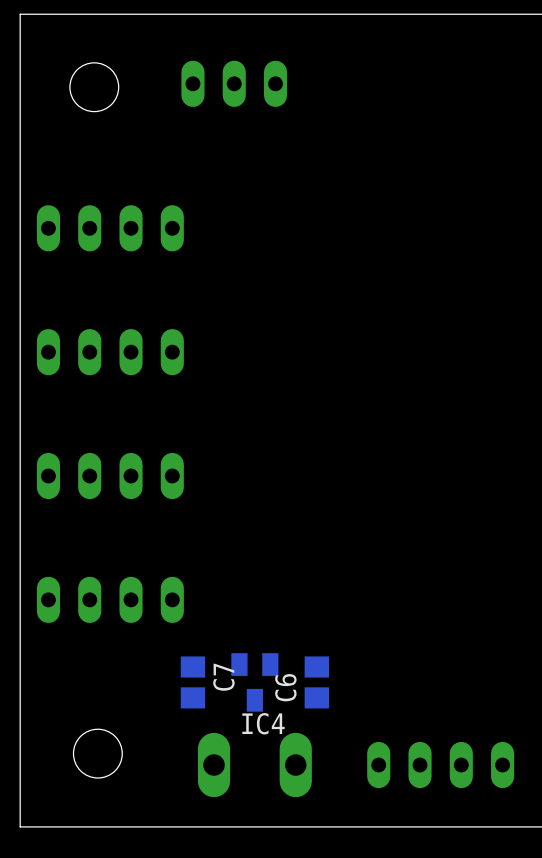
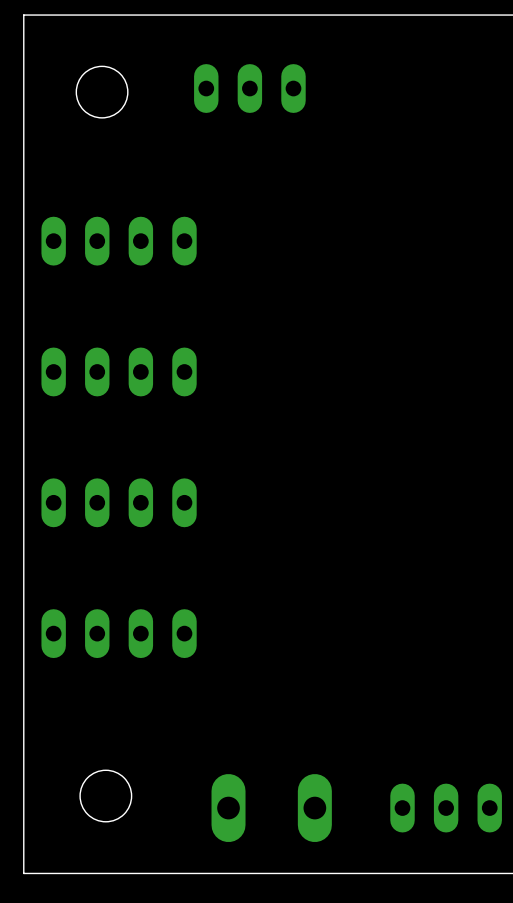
C7: (192, 682) -> none
IC4: (254, 682) -> none
C6: (316, 682) -> none

